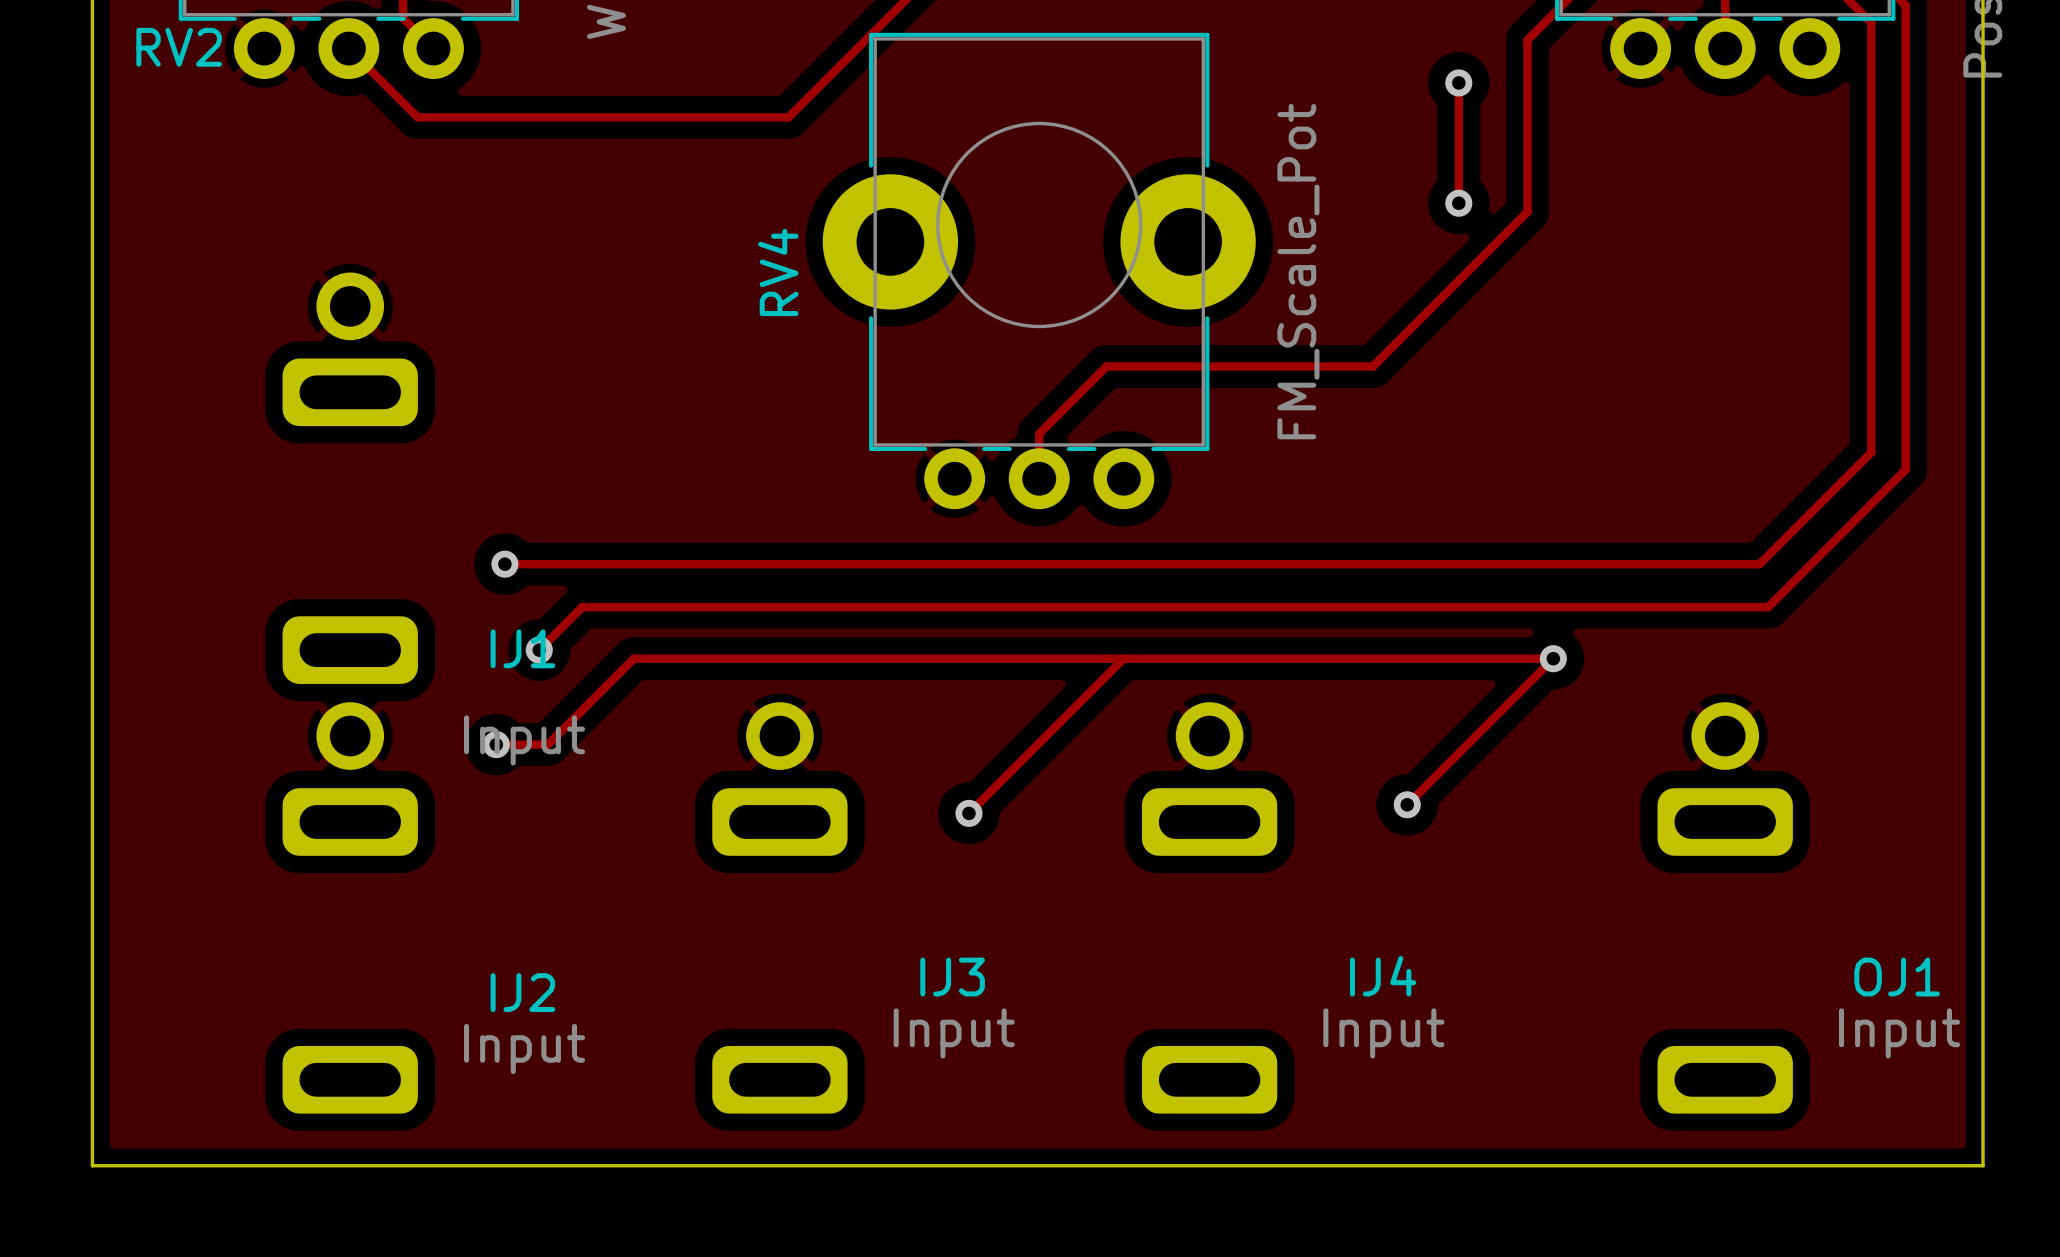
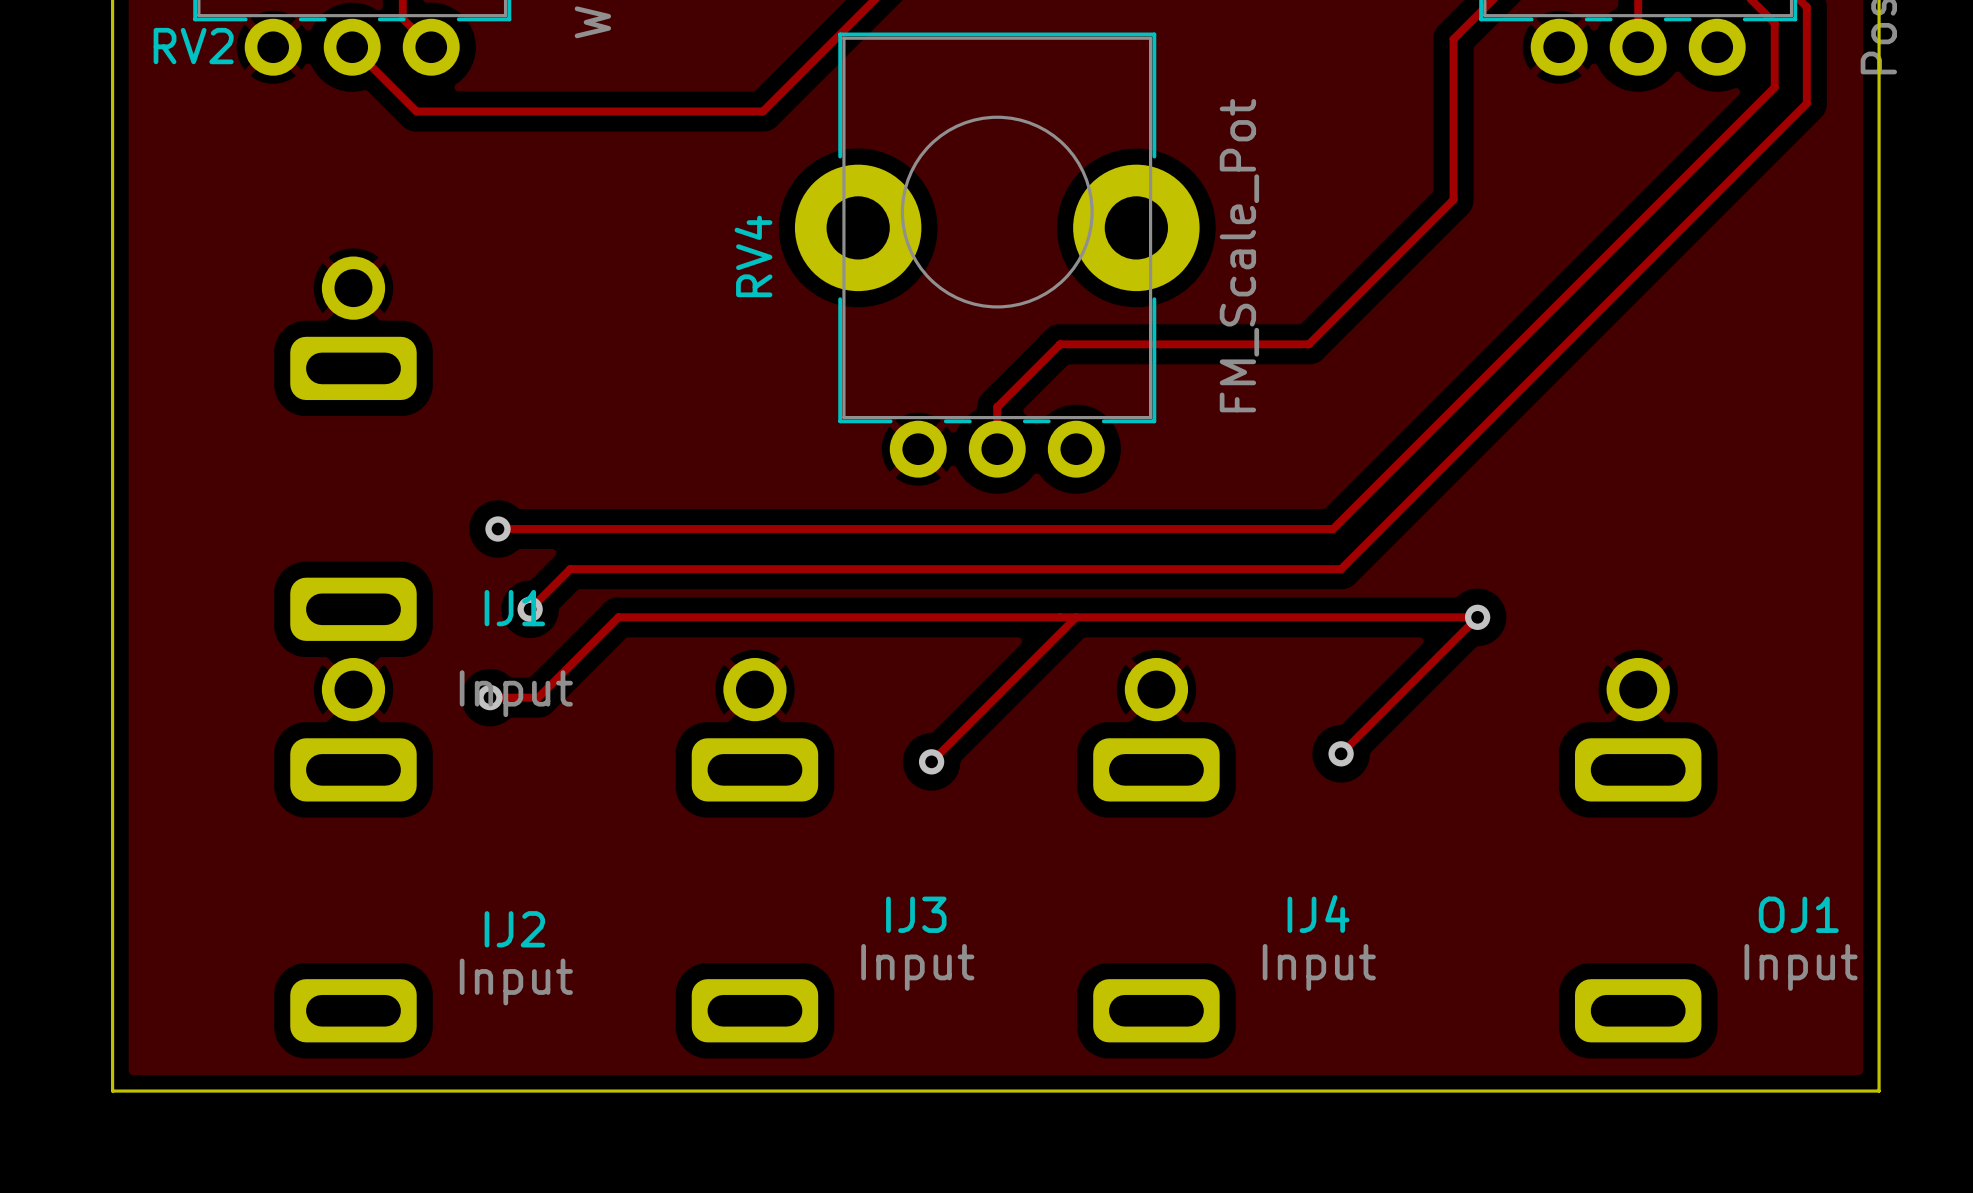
track: (1458, 82) (1458, 203) -> none
via: (1458, 82) -> none
track: (1871, 91) (1871, 452) (1759, 564) (1398, 564) -> (1774, 87) (1333, 529)
track: (1905, 108) (1905, 469) (1768, 607) (1407, 607) -> (1806, 103) (1341, 569)
via: (1458, 203) -> none

